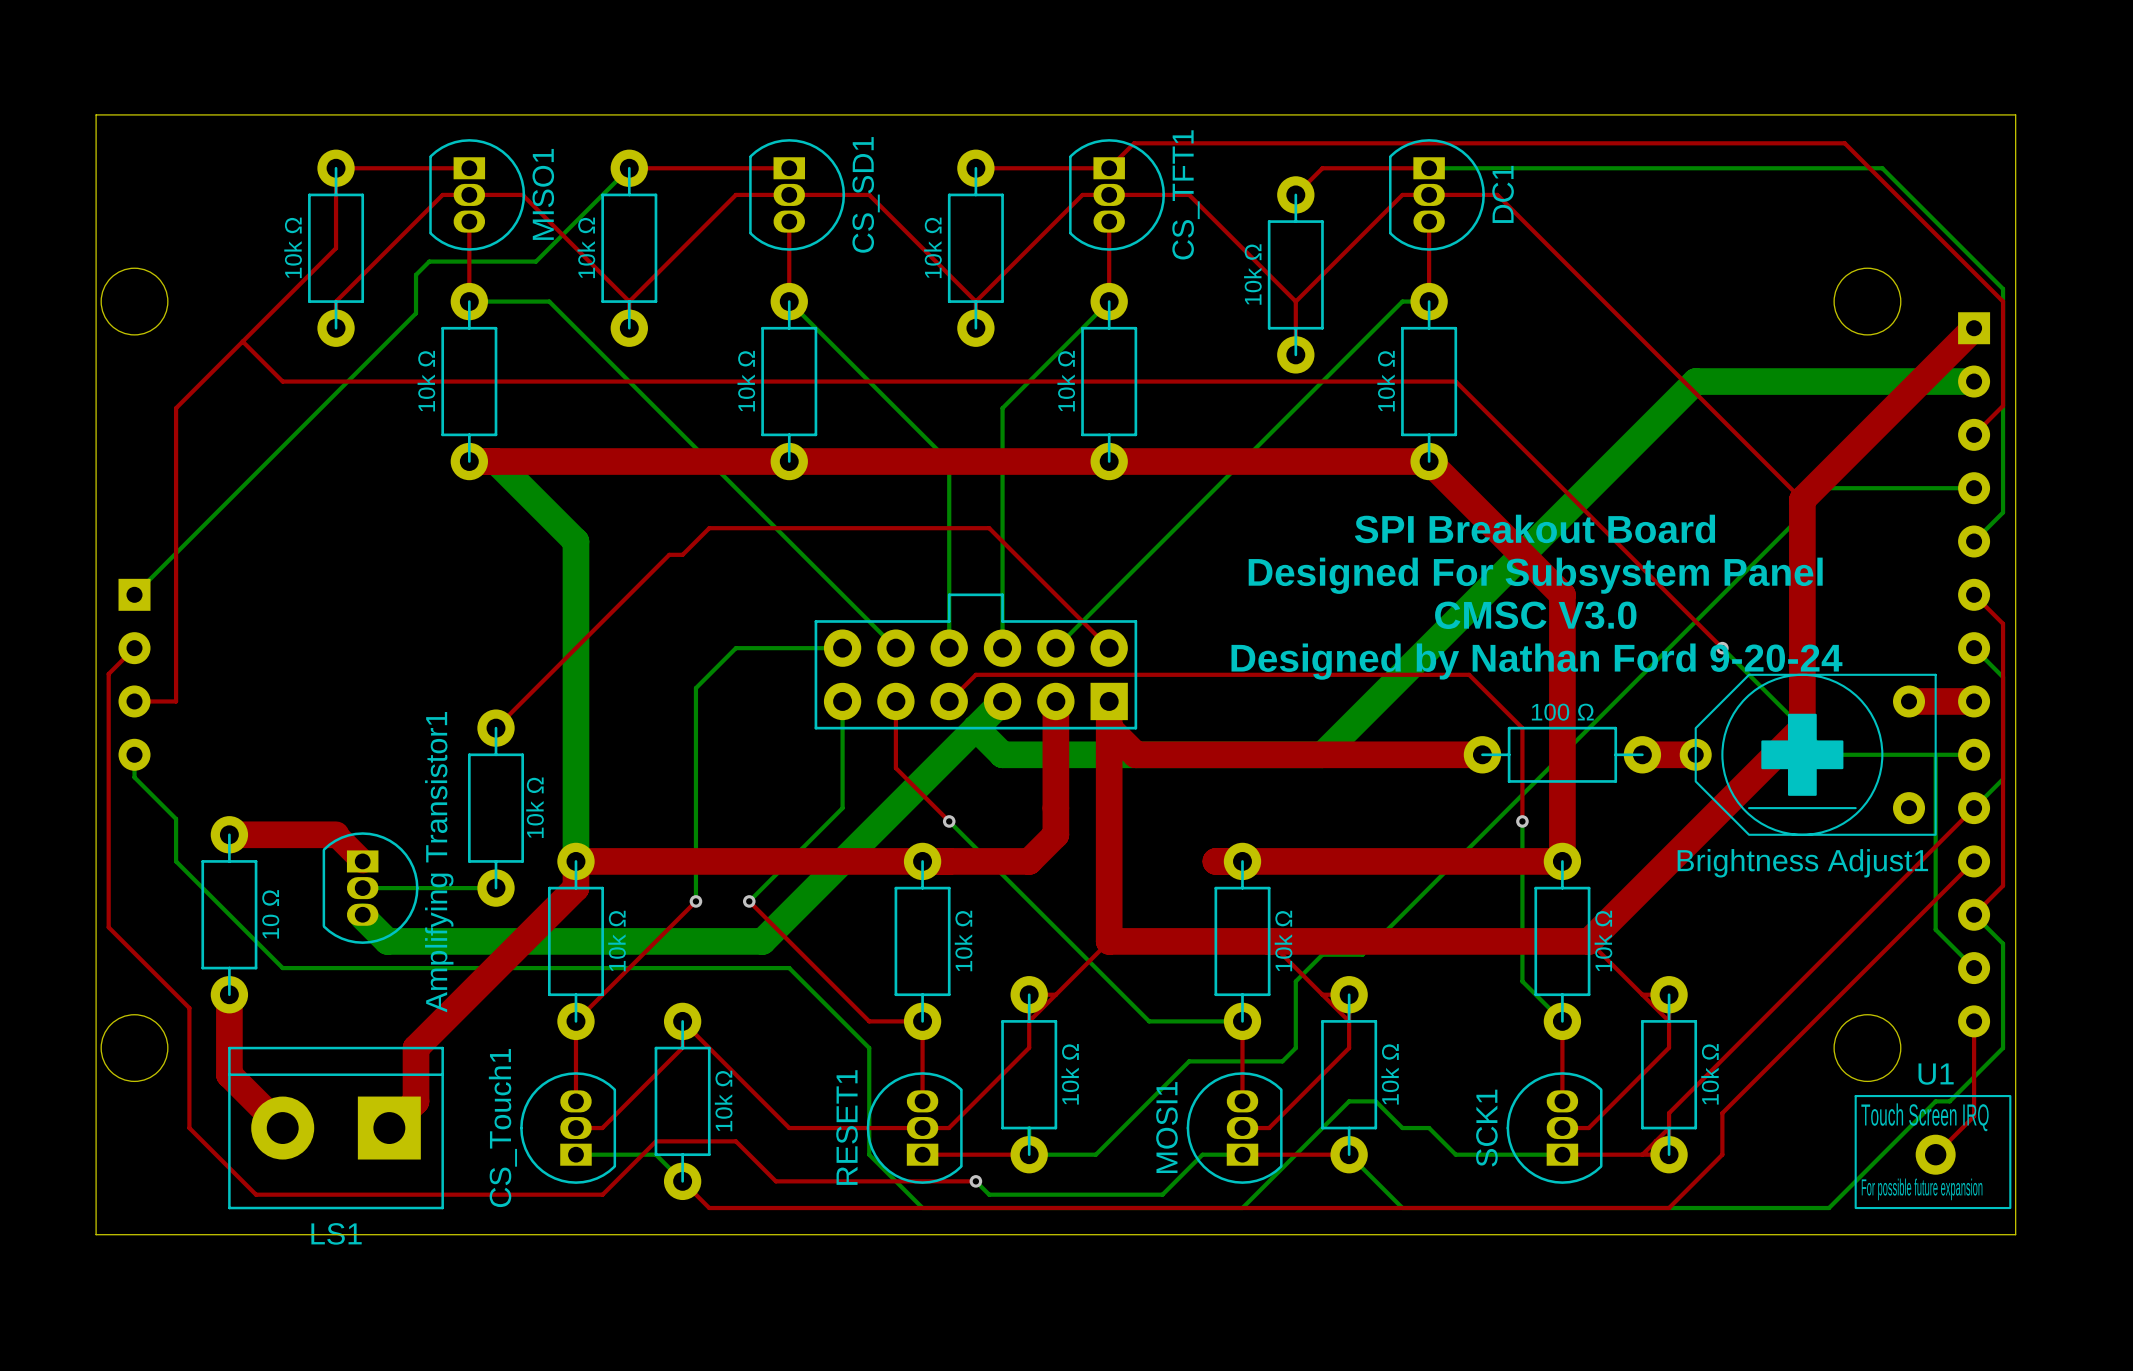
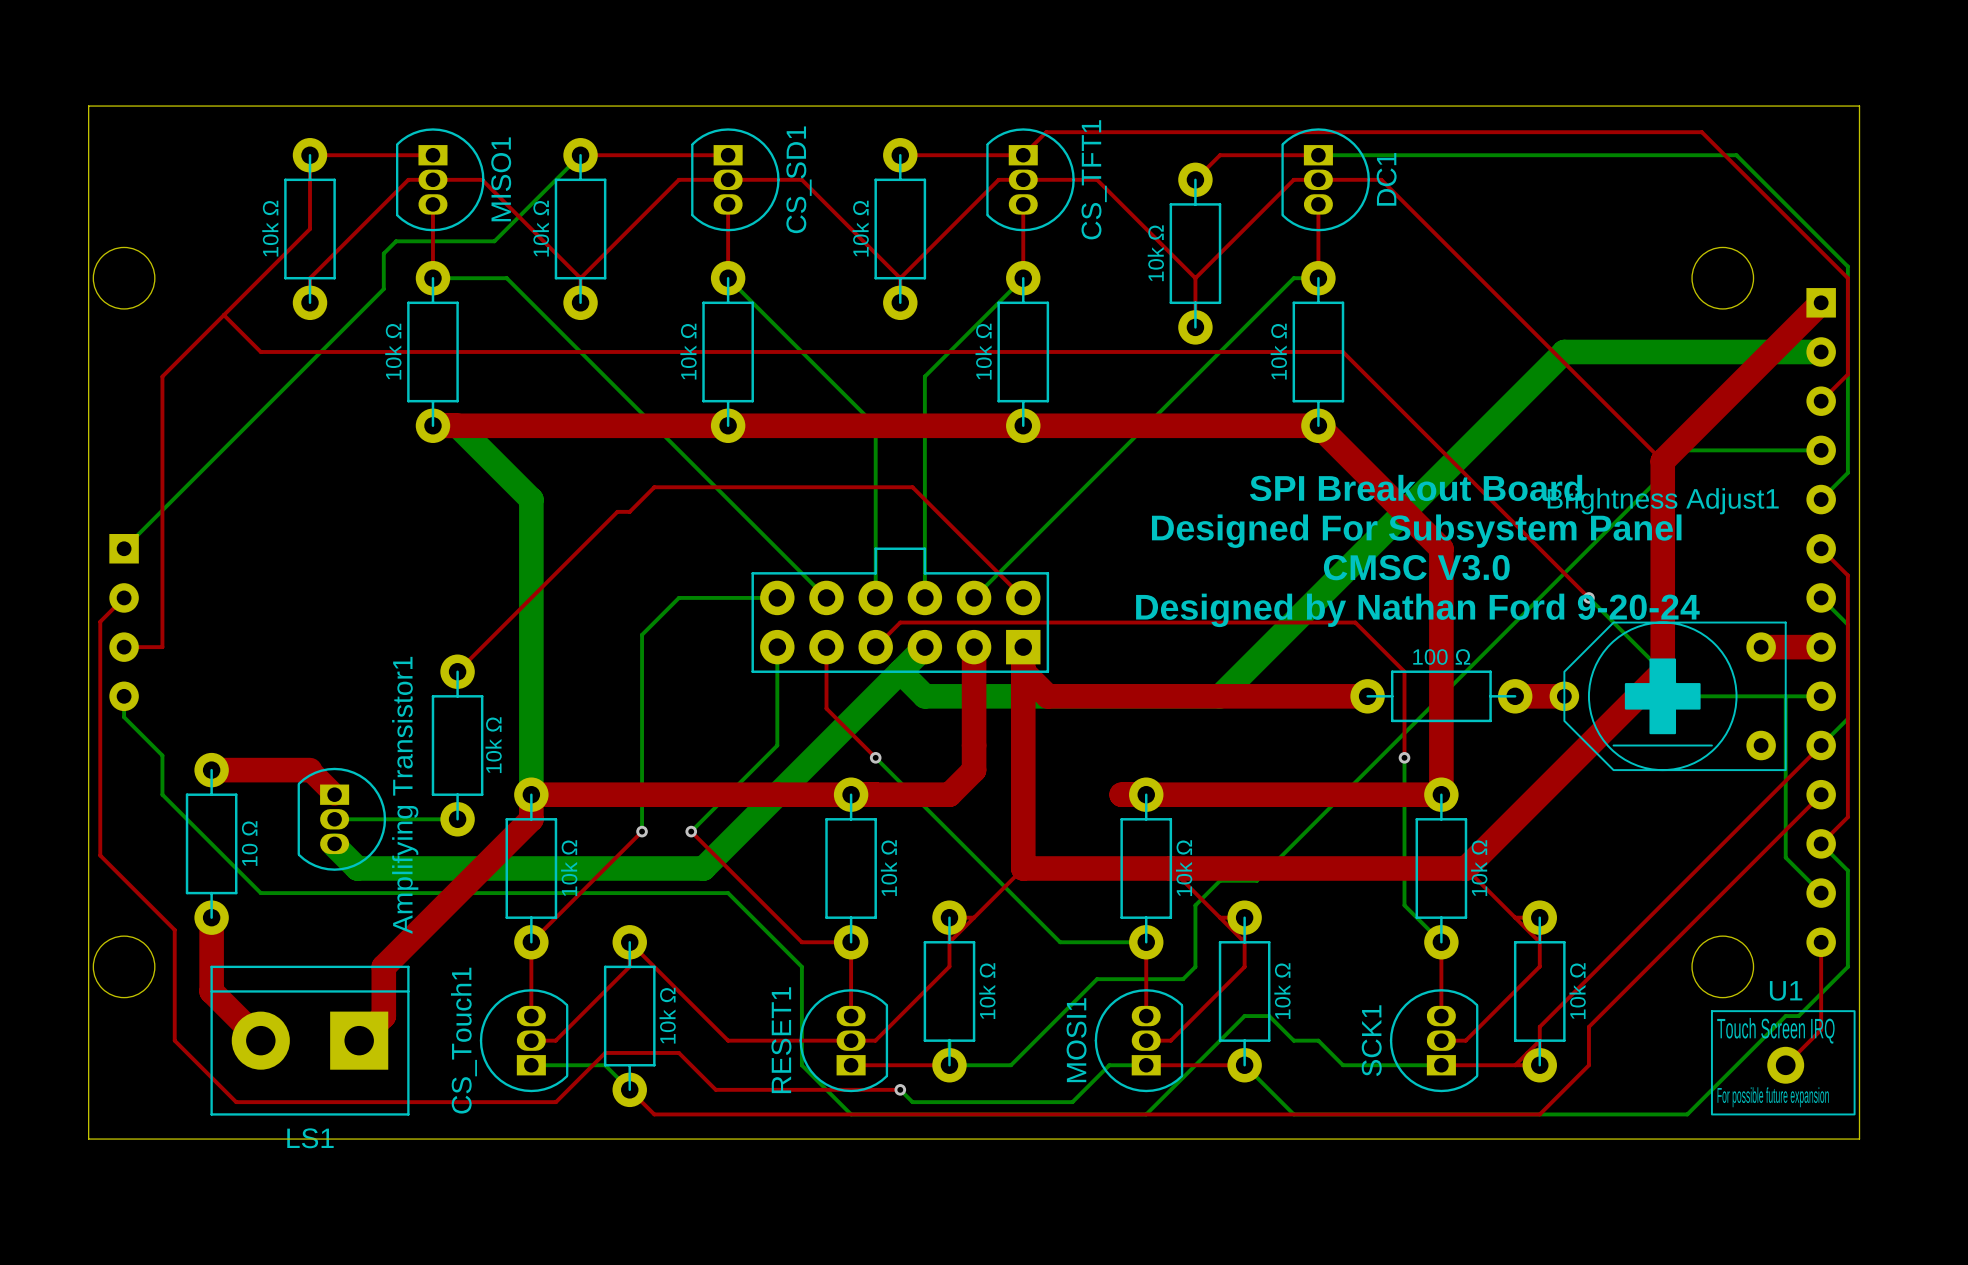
Brightness Adjust1 name position: Brightness Adjust1 (1802, 863) -> Brightness Adjust1 (1663, 501)

